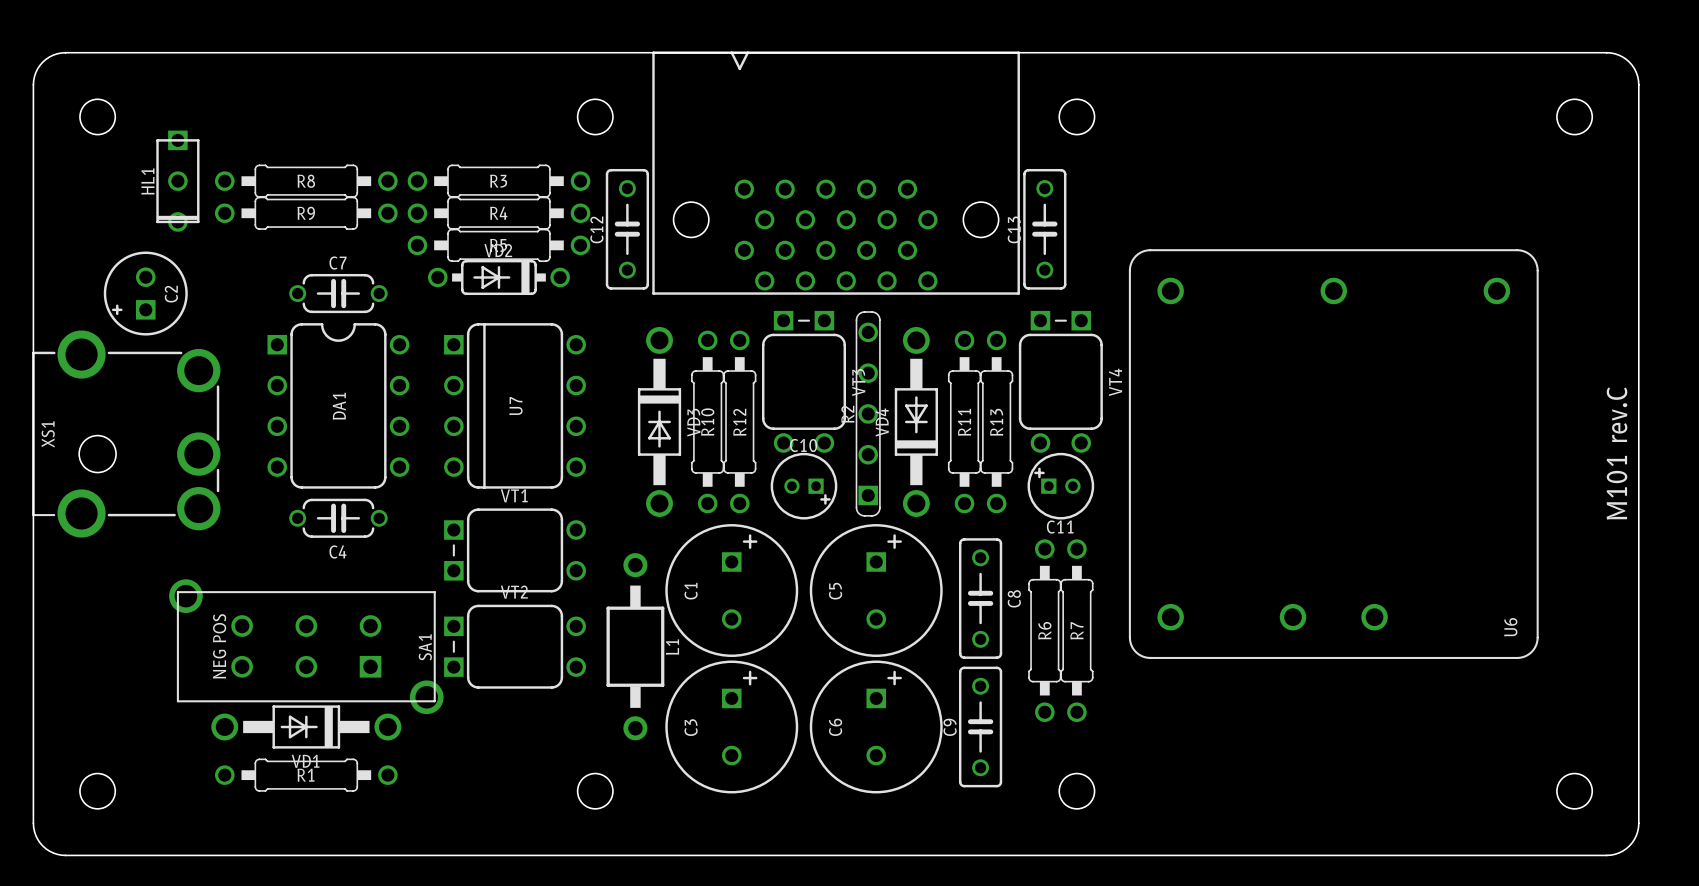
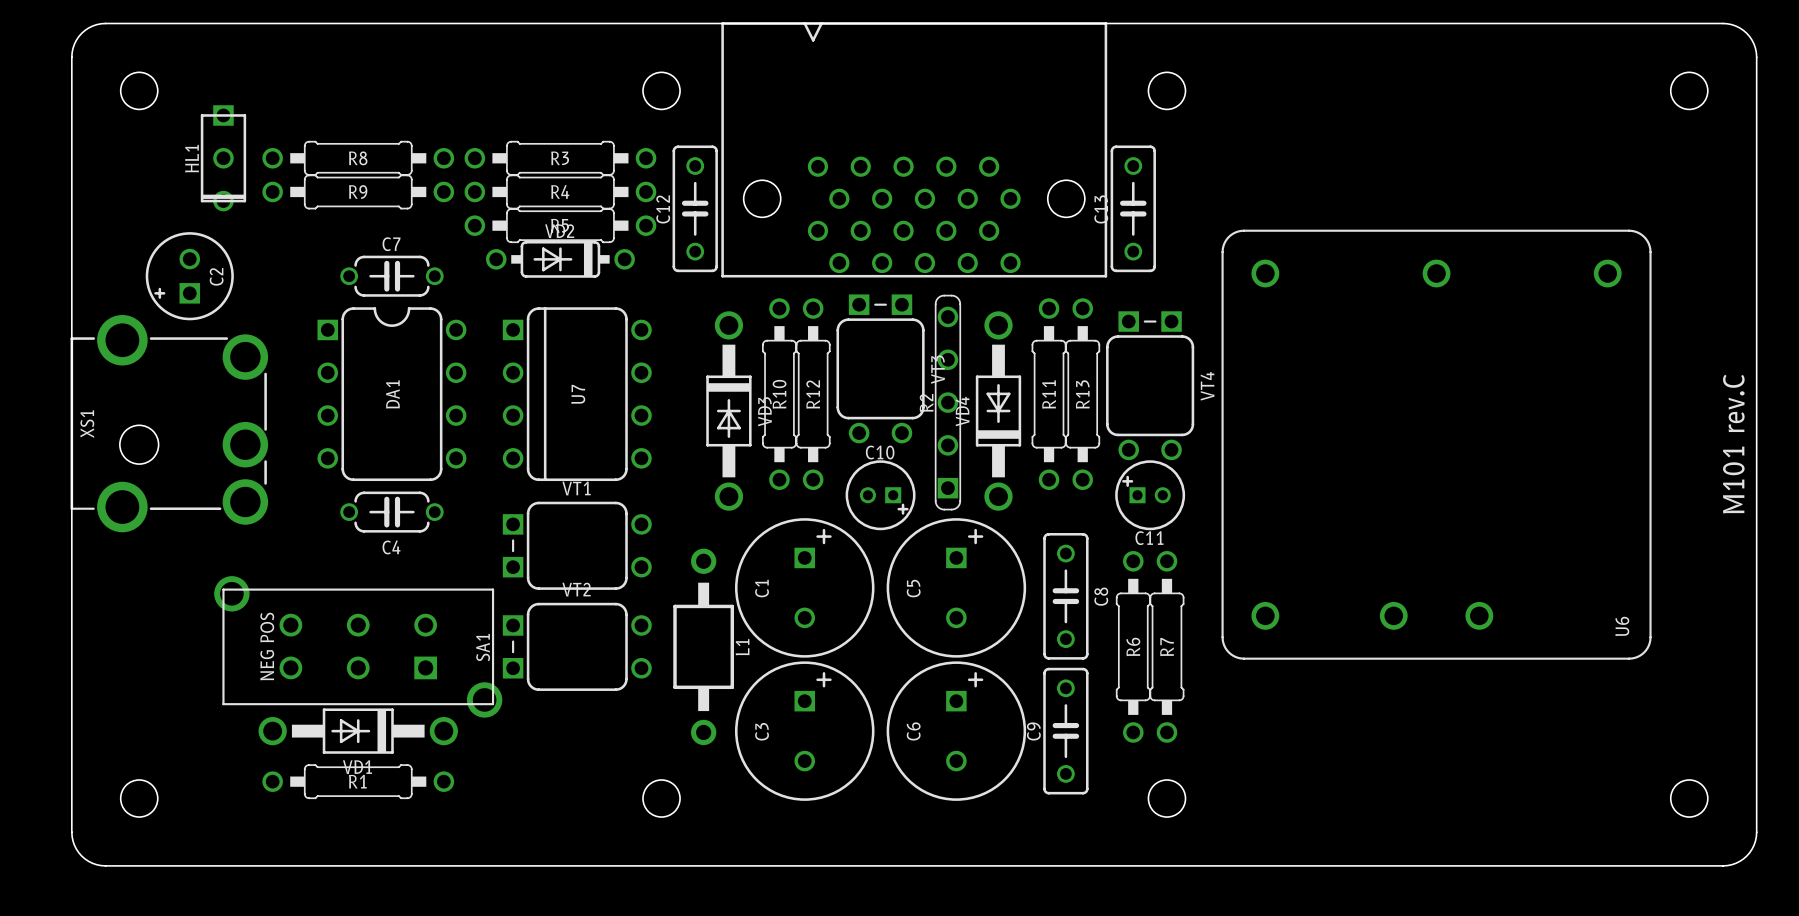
VT4 position: (1060, 381) -> (1150, 385)
R10 position: (707, 421) -> (779, 394)
R12 position: (739, 421) -> (813, 394)
R11 position: (964, 421) -> (1049, 394)
R13 position: (996, 421) -> (1082, 394)
C10 position: (803, 486) -> (880, 495)
C11 position: (1060, 486) -> (1150, 495)
R6 position: (1044, 630) -> (1133, 646)
R7 position: (1076, 630) -> (1166, 646)

